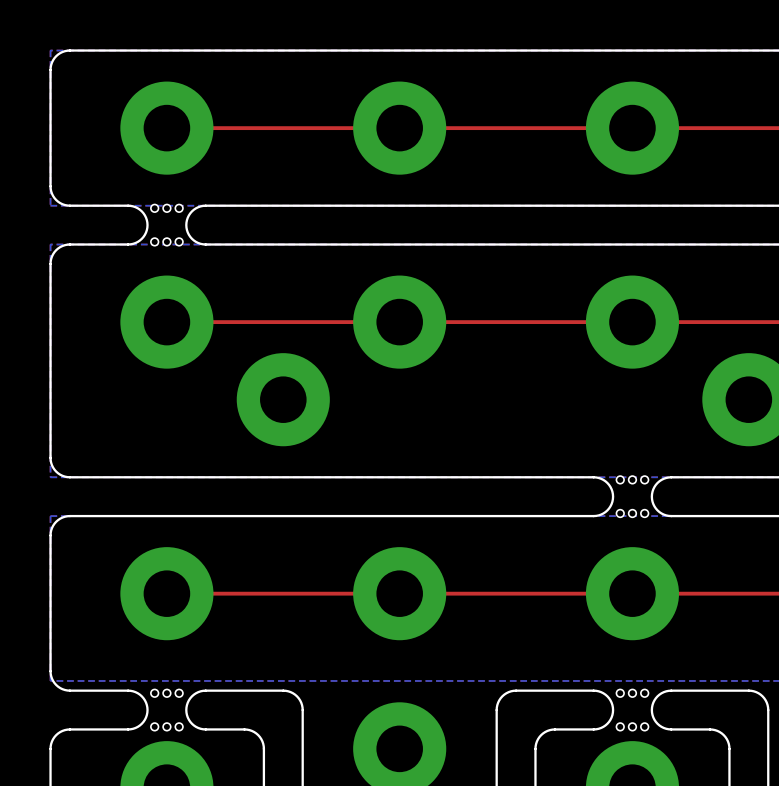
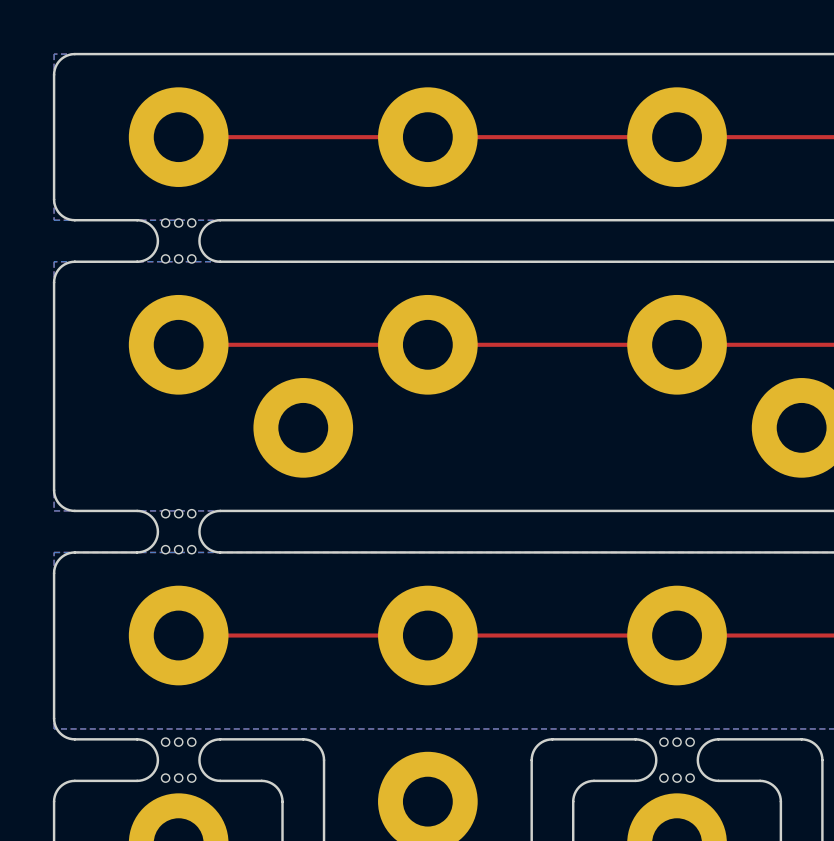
board edge: (205, 477) (128, 477) -> (220, 510) (212, 512) (205, 517) (201, 523) (199, 531) (201, 539) (205, 546) (212, 550) (220, 552)
board edge: (593, 477) (607, 482) (613, 496) (607, 510) (593, 516) -> (718, 552) (635, 552)
board edge: (671, 477) (657, 482) (651, 496) (657, 510) (671, 516) -> (718, 510) (635, 510)
part: none -> (178, 531)
part: (632, 496) -> none
board edge: (205, 516) (128, 516) -> (137, 510) (145, 512) (151, 517) (156, 523) (157, 531) (156, 539) (151, 546) (145, 550) (137, 552)

